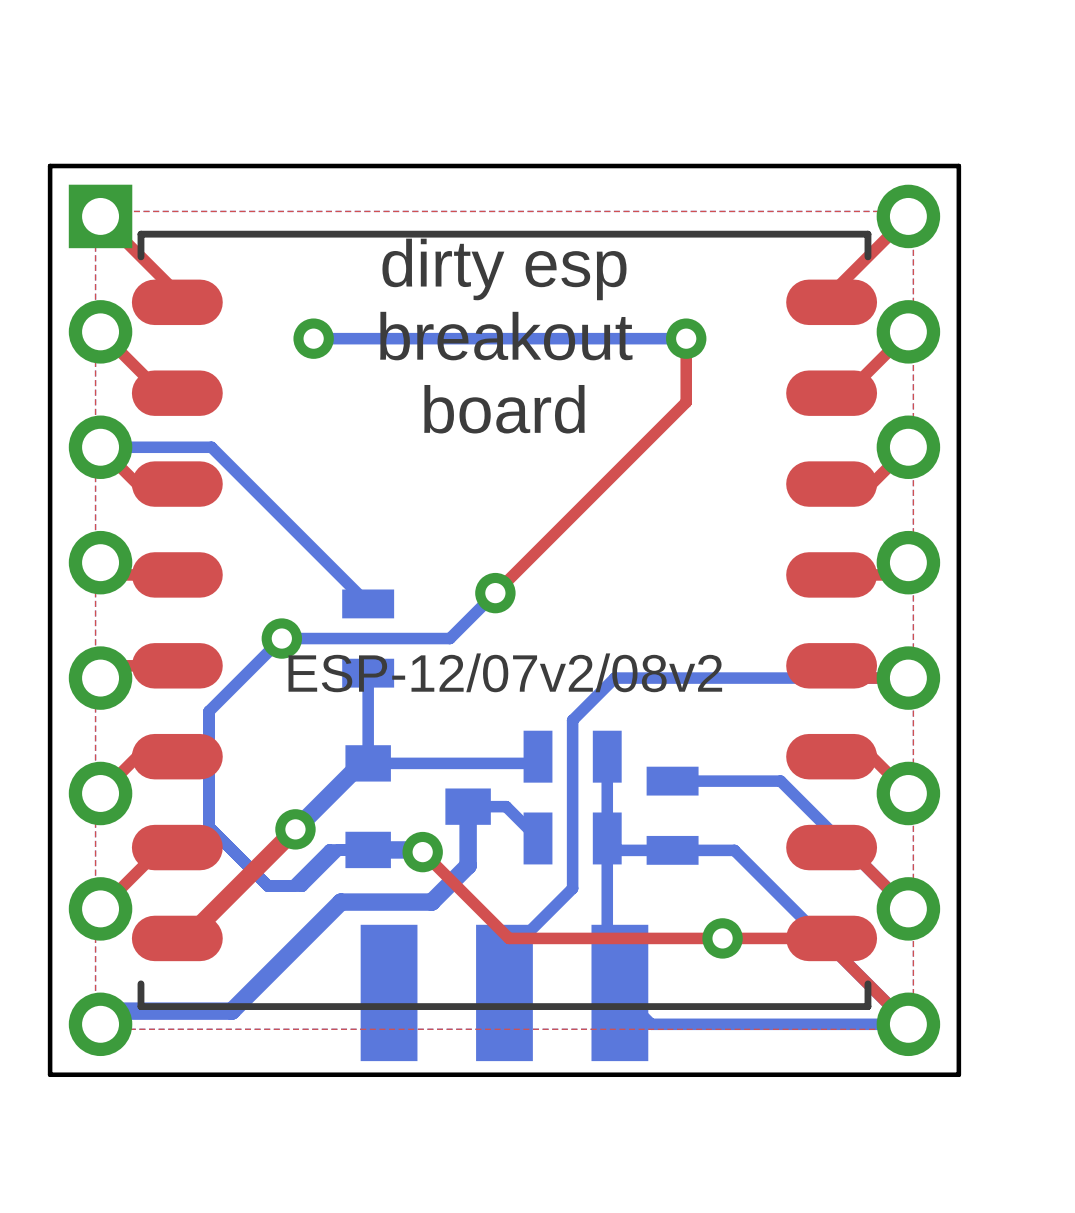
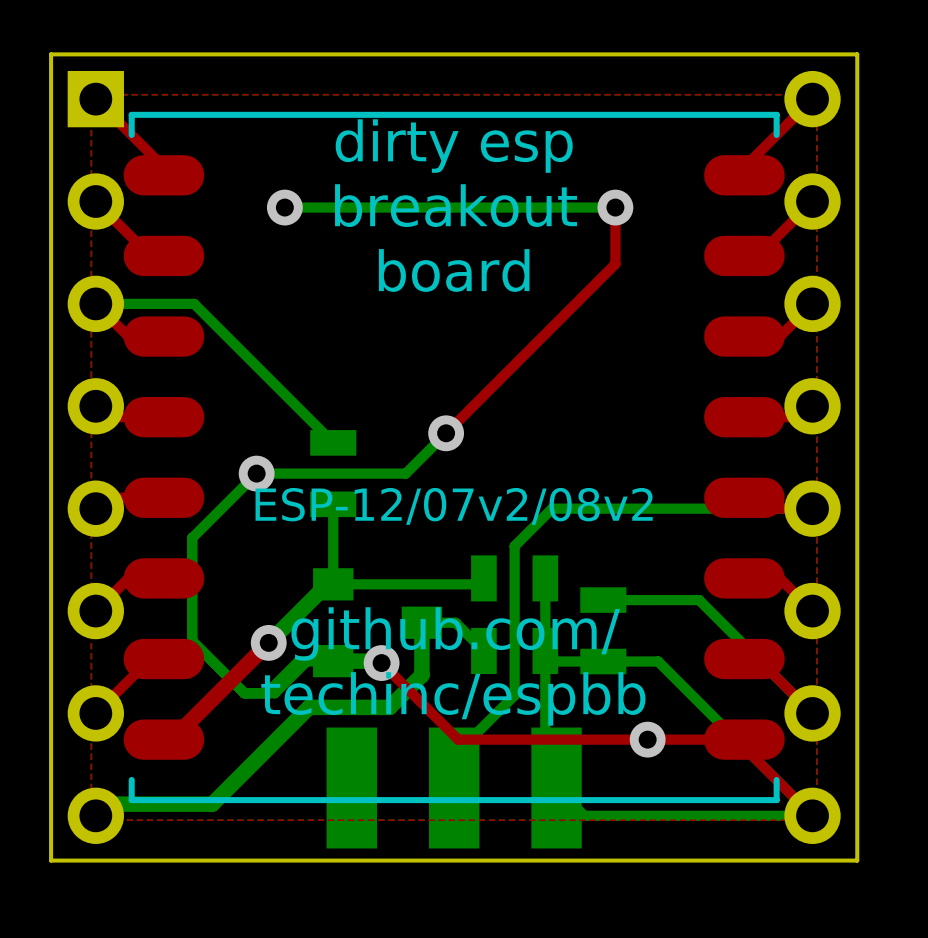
text: none -> github.com/ (455, 633)
text: none -> techinc/espbb (453, 698)

